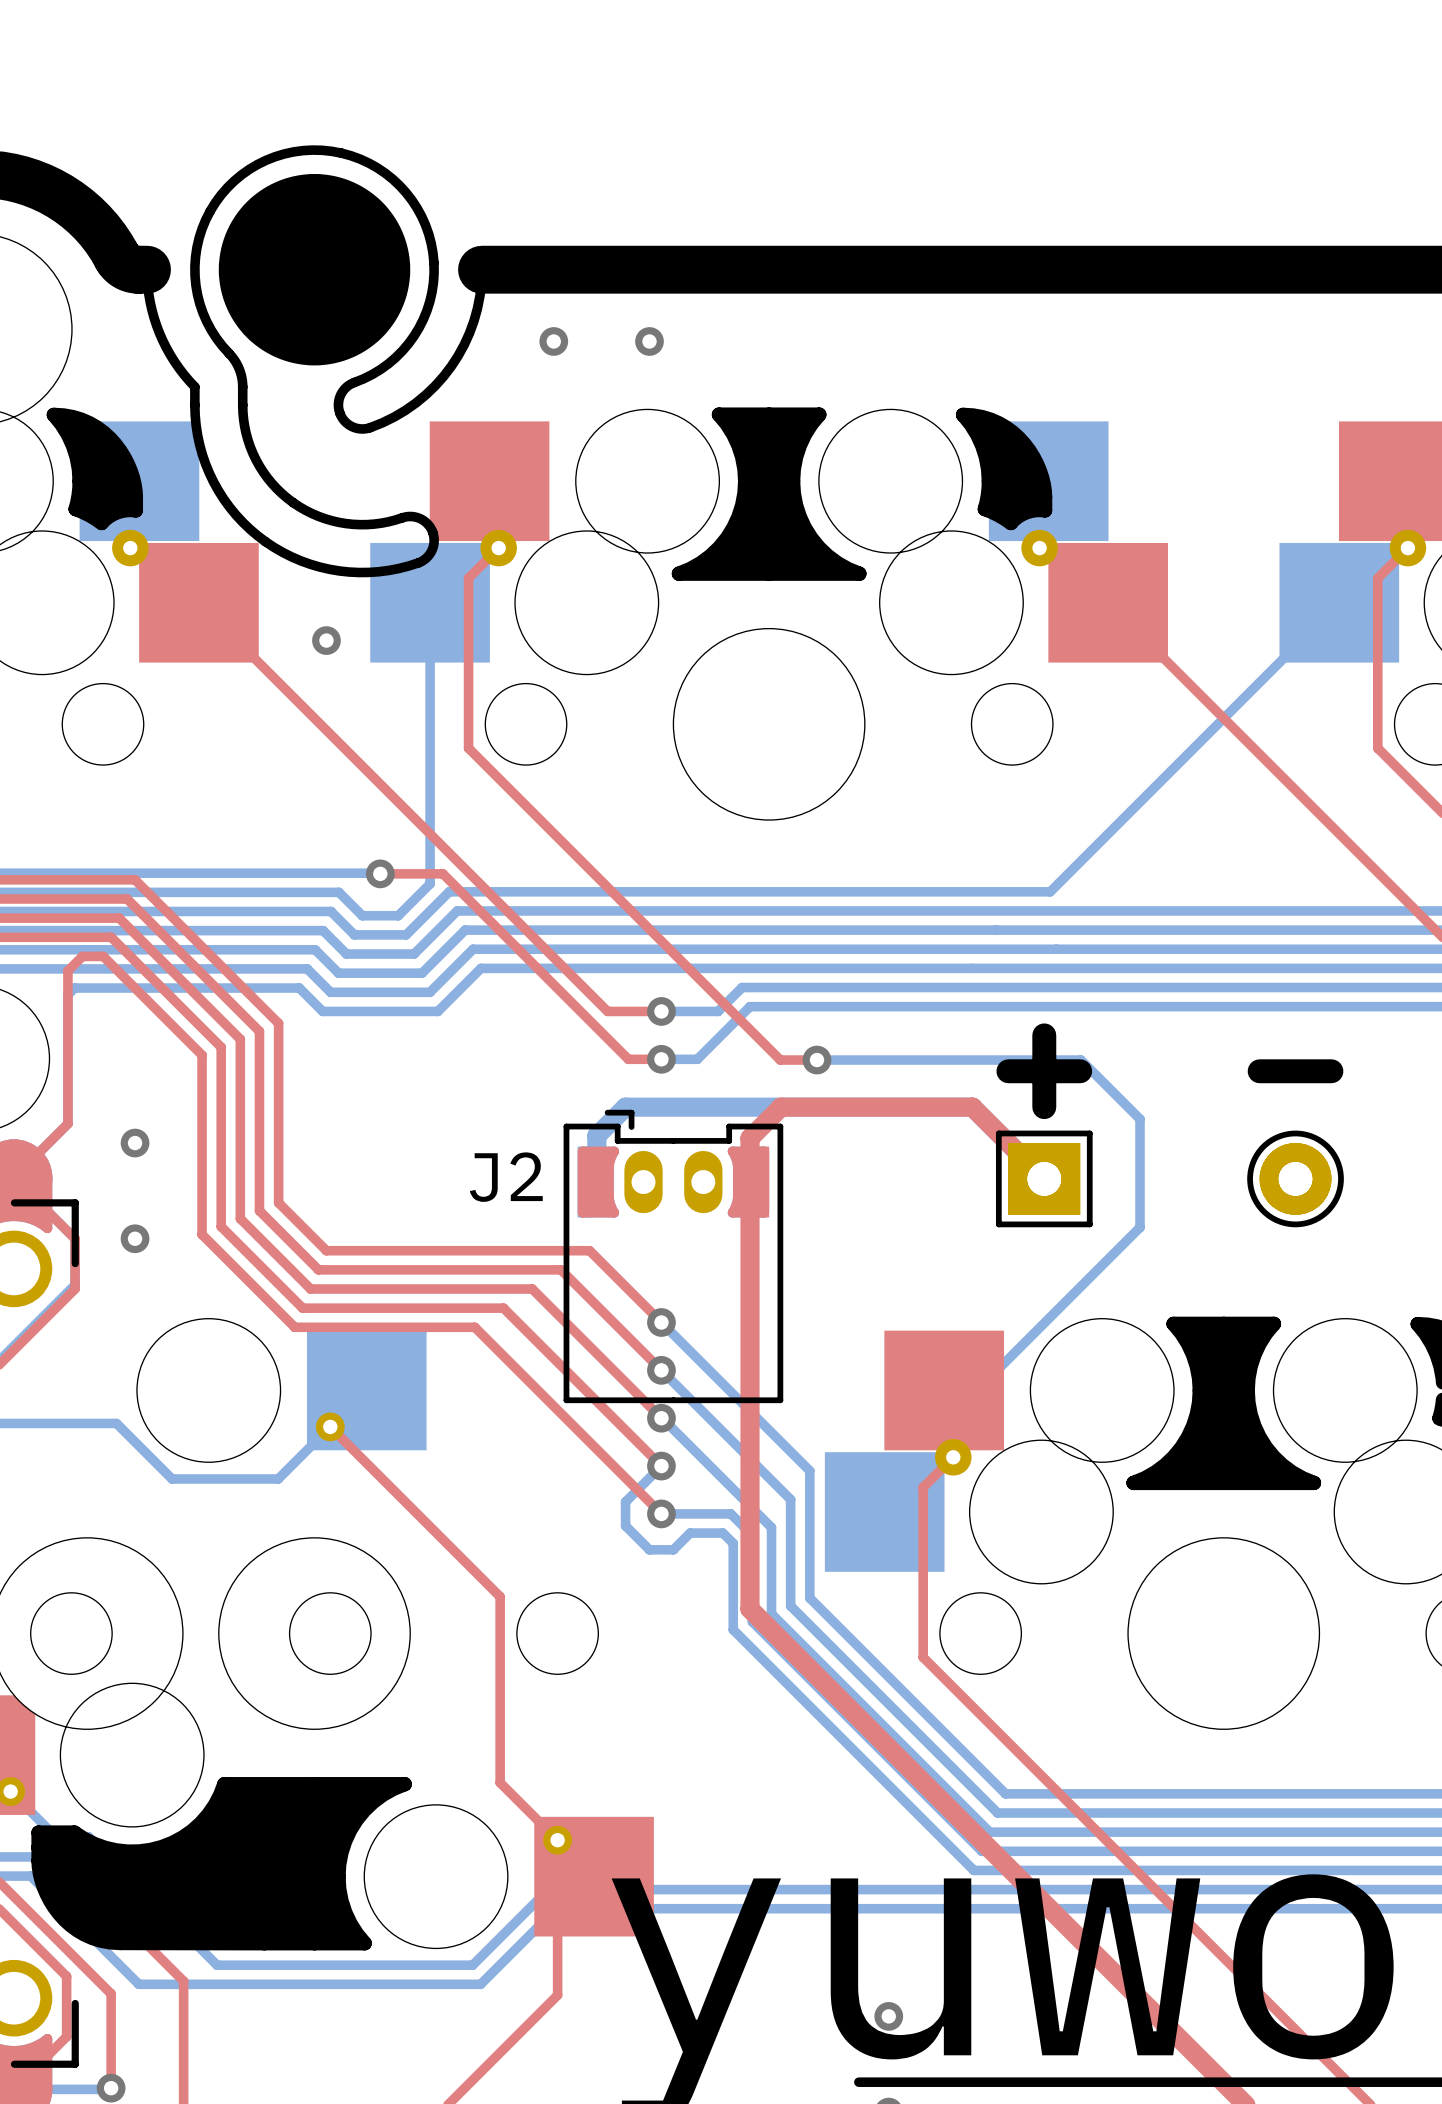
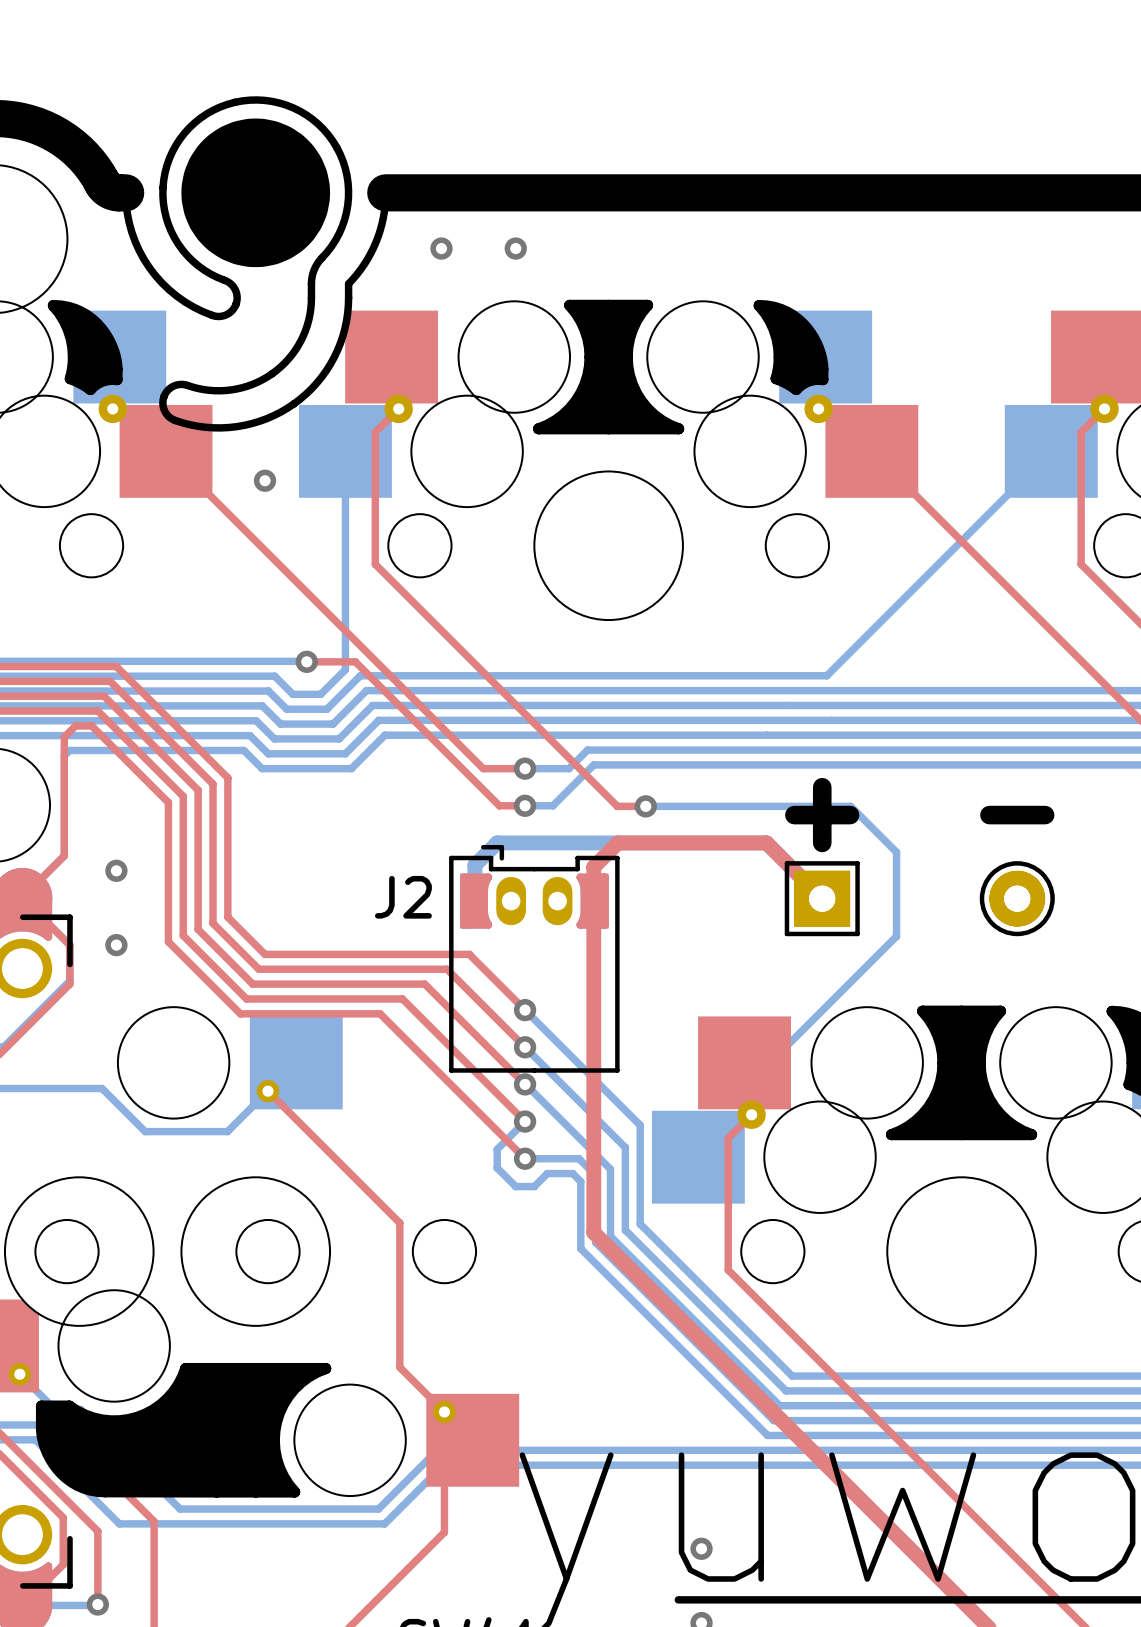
board edge: (147, 269) (148, 294) (156, 325) (174, 361) (194, 386) (195, 415) (199, 444) (209, 473) (223, 499) (249, 529) (282, 552) (319, 567) (359, 572) (388, 570) (422, 560) (429, 554) (433, 546) (431, 530) (424, 521) (411, 516) (367, 524) (345, 523) (325, 518) (293, 502) (267, 477) (253, 453) (246, 433) (242, 412) (242, 382) (239, 368) (211, 330) (199, 303) (194, 266) (196, 247) (202, 228) (215, 202) (234, 180) (257, 164) (293, 151) (322, 150) (351, 155) (377, 167) (392, 179) (406, 192) (421, 216) (431, 243) (433, 263) (432, 292) (423, 319) (402, 350) (380, 369) (350, 384) (341, 392) (338, 403) (340, 415) (348, 424) (358, 428) (370, 427) (405, 410) (425, 394) (443, 376) (464, 344) (473, 320) (479, 295) (482, 269) -> (125, 192) (127, 213) (131, 232) (139, 250) (155, 275) (169, 289) (185, 302) (212, 315) (221, 316) (229, 312) (235, 305) (237, 296) (234, 288) (228, 282) (204, 270) (187, 255) (171, 231) (164, 210) (163, 187) (165, 172) (172, 151) (184, 133) (206, 113) (227, 104) (249, 100) (272, 101) (299, 111) (317, 123) (332, 140) (343, 161) (348, 190) (344, 219) (335, 239) (314, 269) (308, 320) (303, 335) (292, 354) (272, 373) (247, 386) (214, 390) (180, 384) (170, 388) (164, 395) (163, 407) (171, 418) (197, 426) (221, 427) (251, 423) (280, 412) (305, 394) (326, 370) (337, 350) (344, 328) (348, 305) (348, 283) (364, 264) (378, 236) (384, 211) (385, 192)

